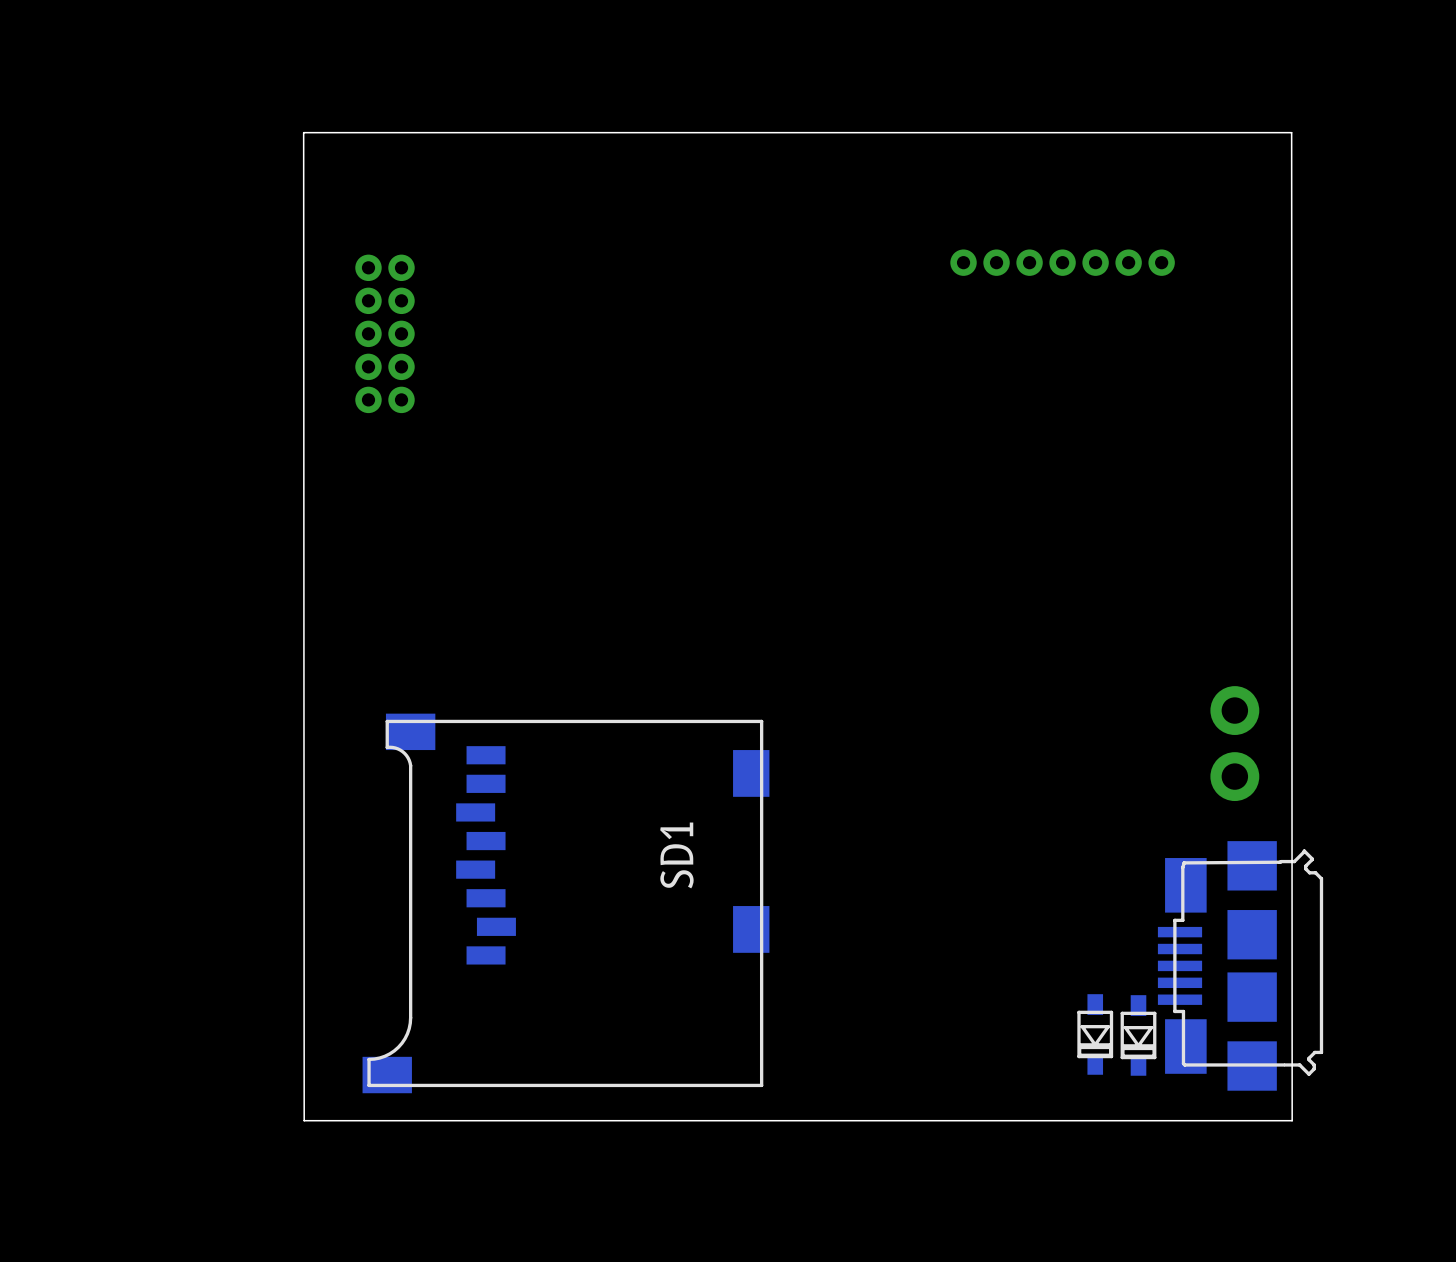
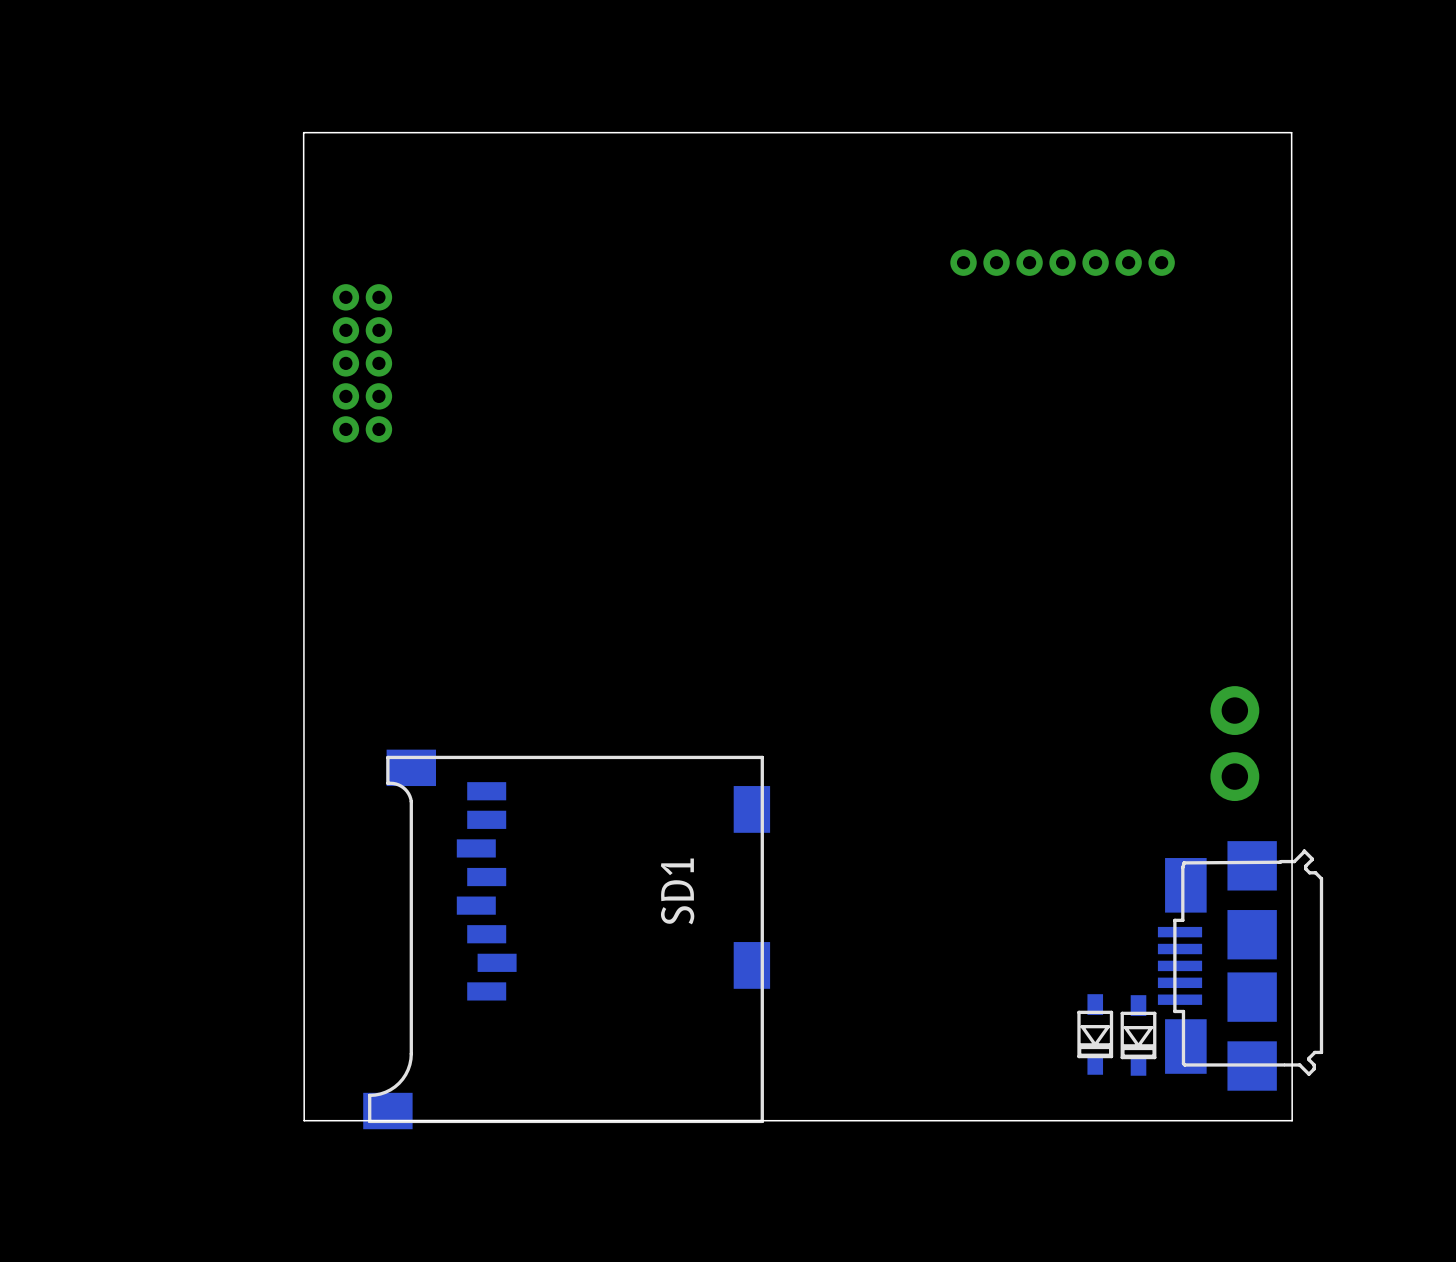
part position: (385, 333) -> (362, 363)
SD1 position: (565, 903) -> (566, 939)

